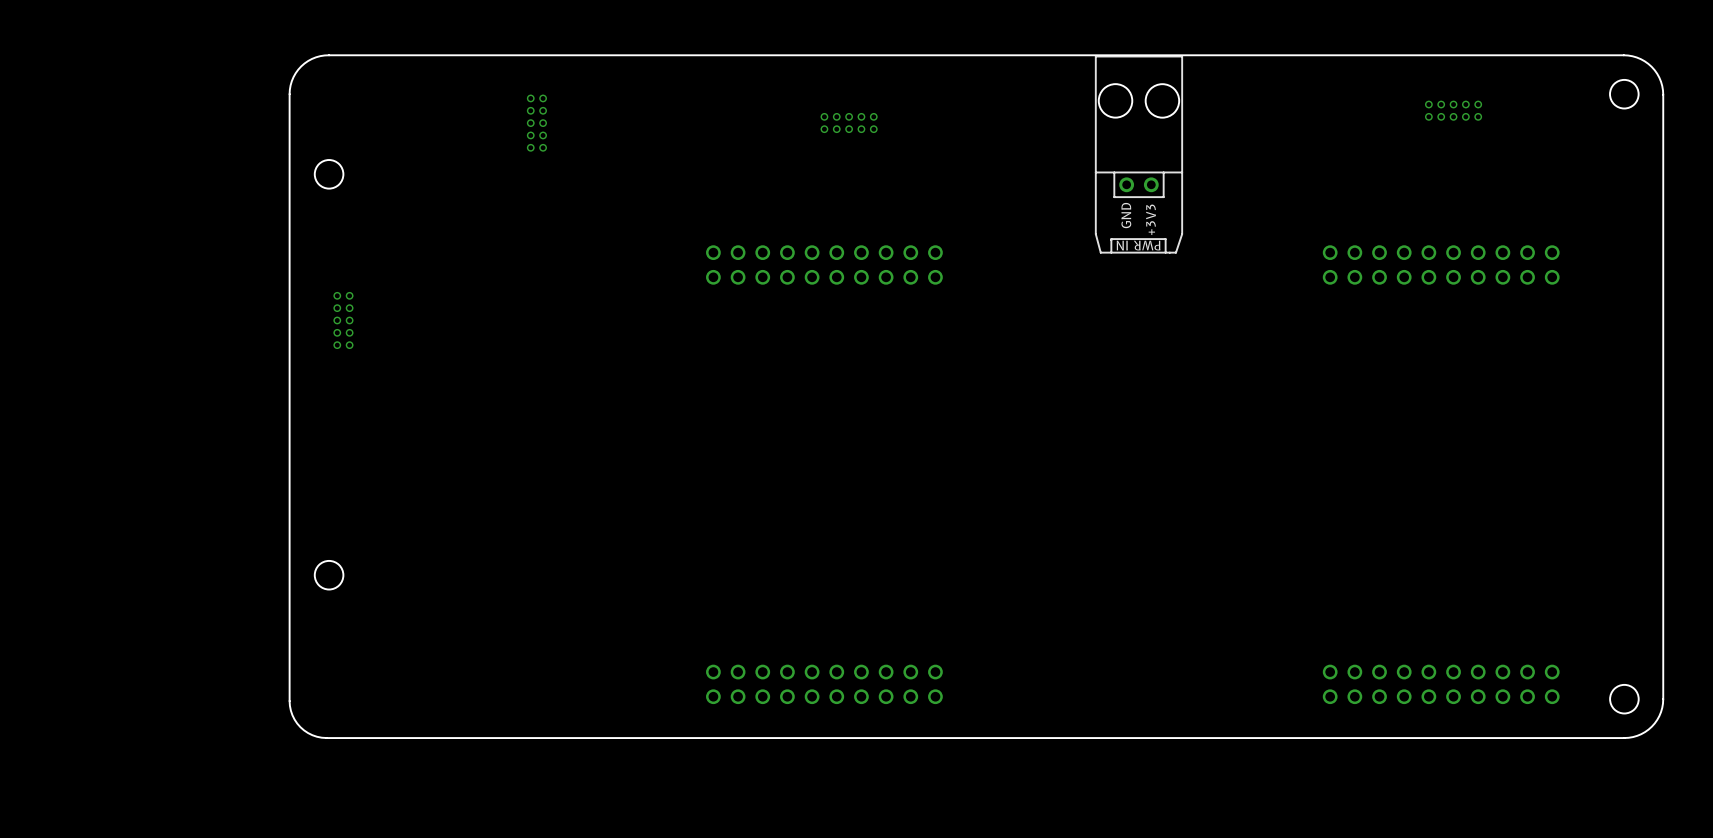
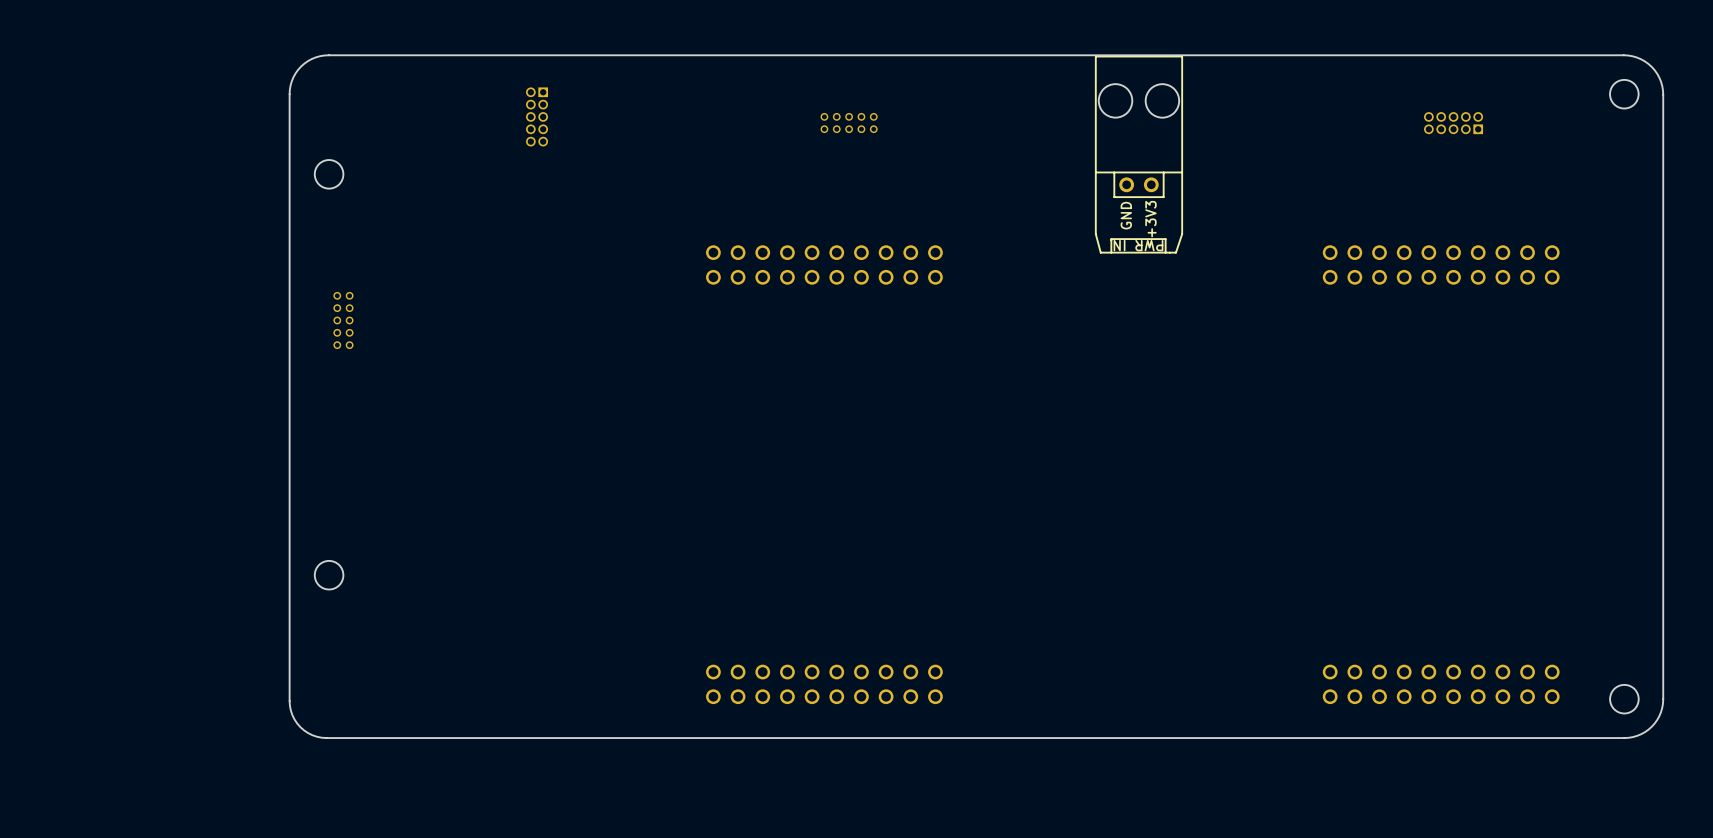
part footprint: [526, 94, 547, 152] -> [525, 87, 549, 147]
part: (1453, 110) -> none
part: none -> (1453, 123)

